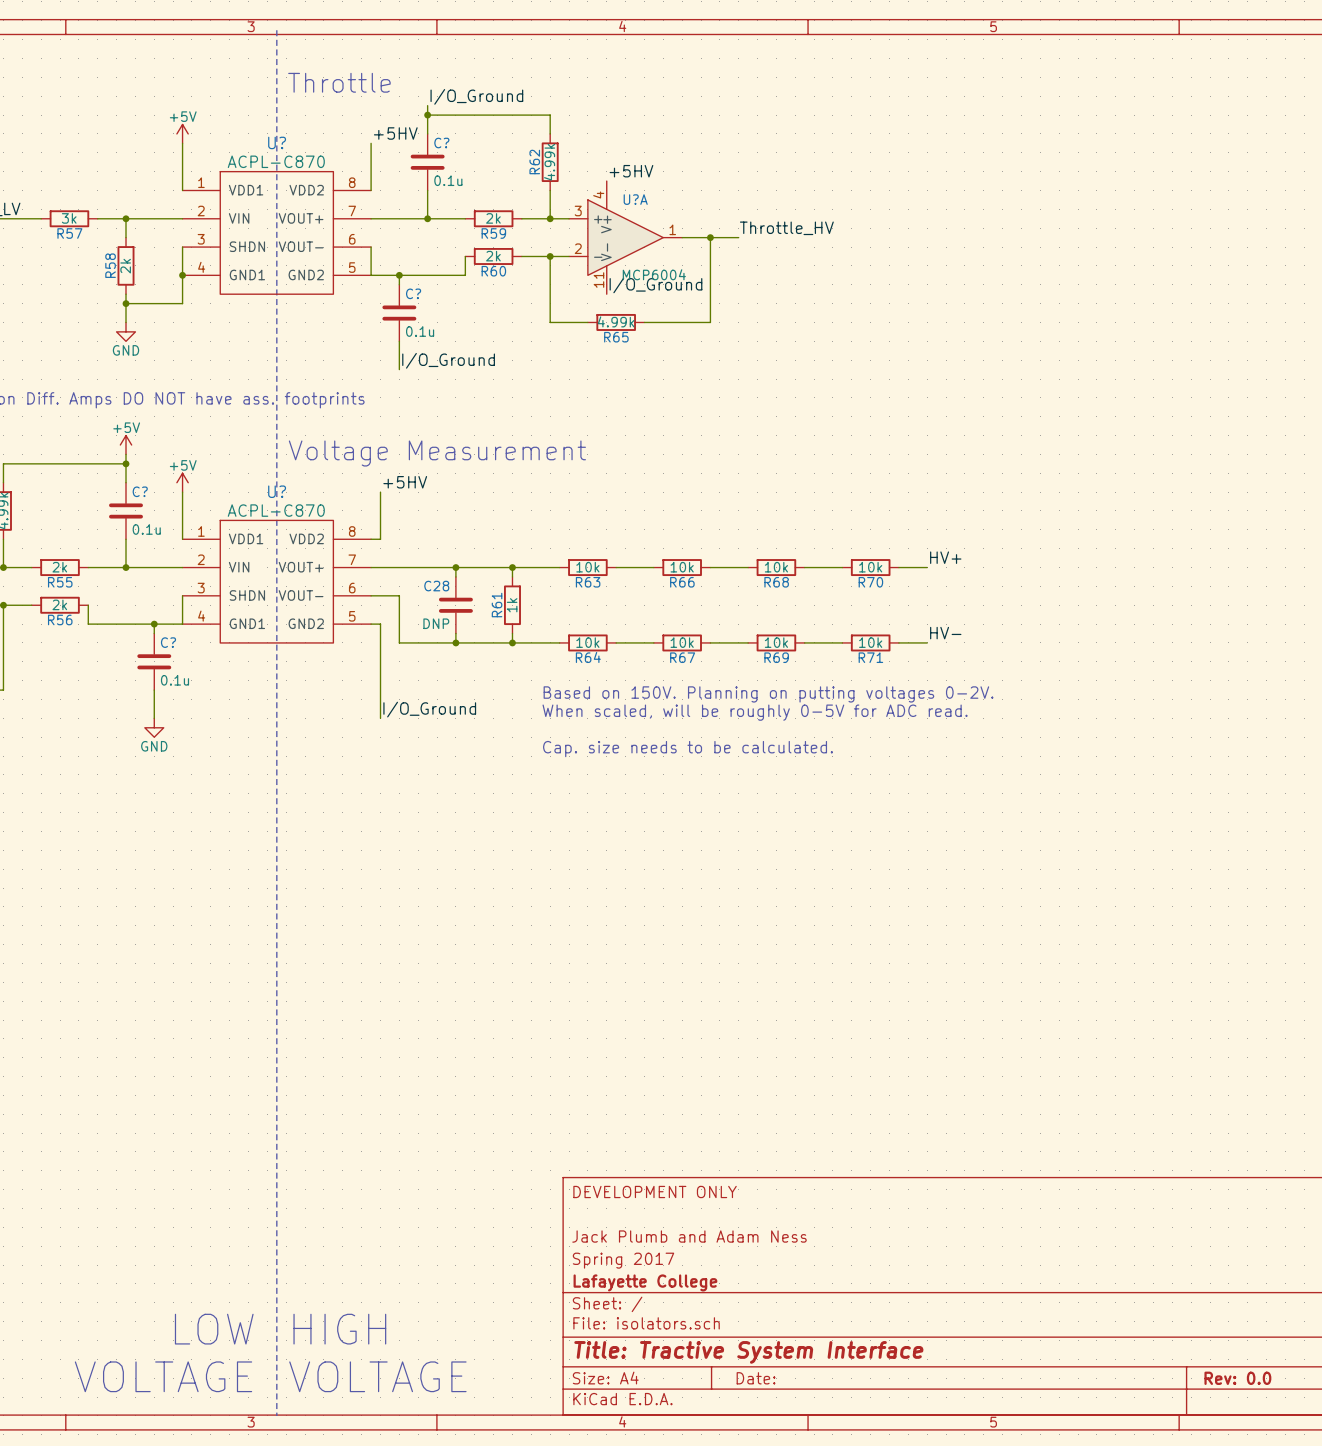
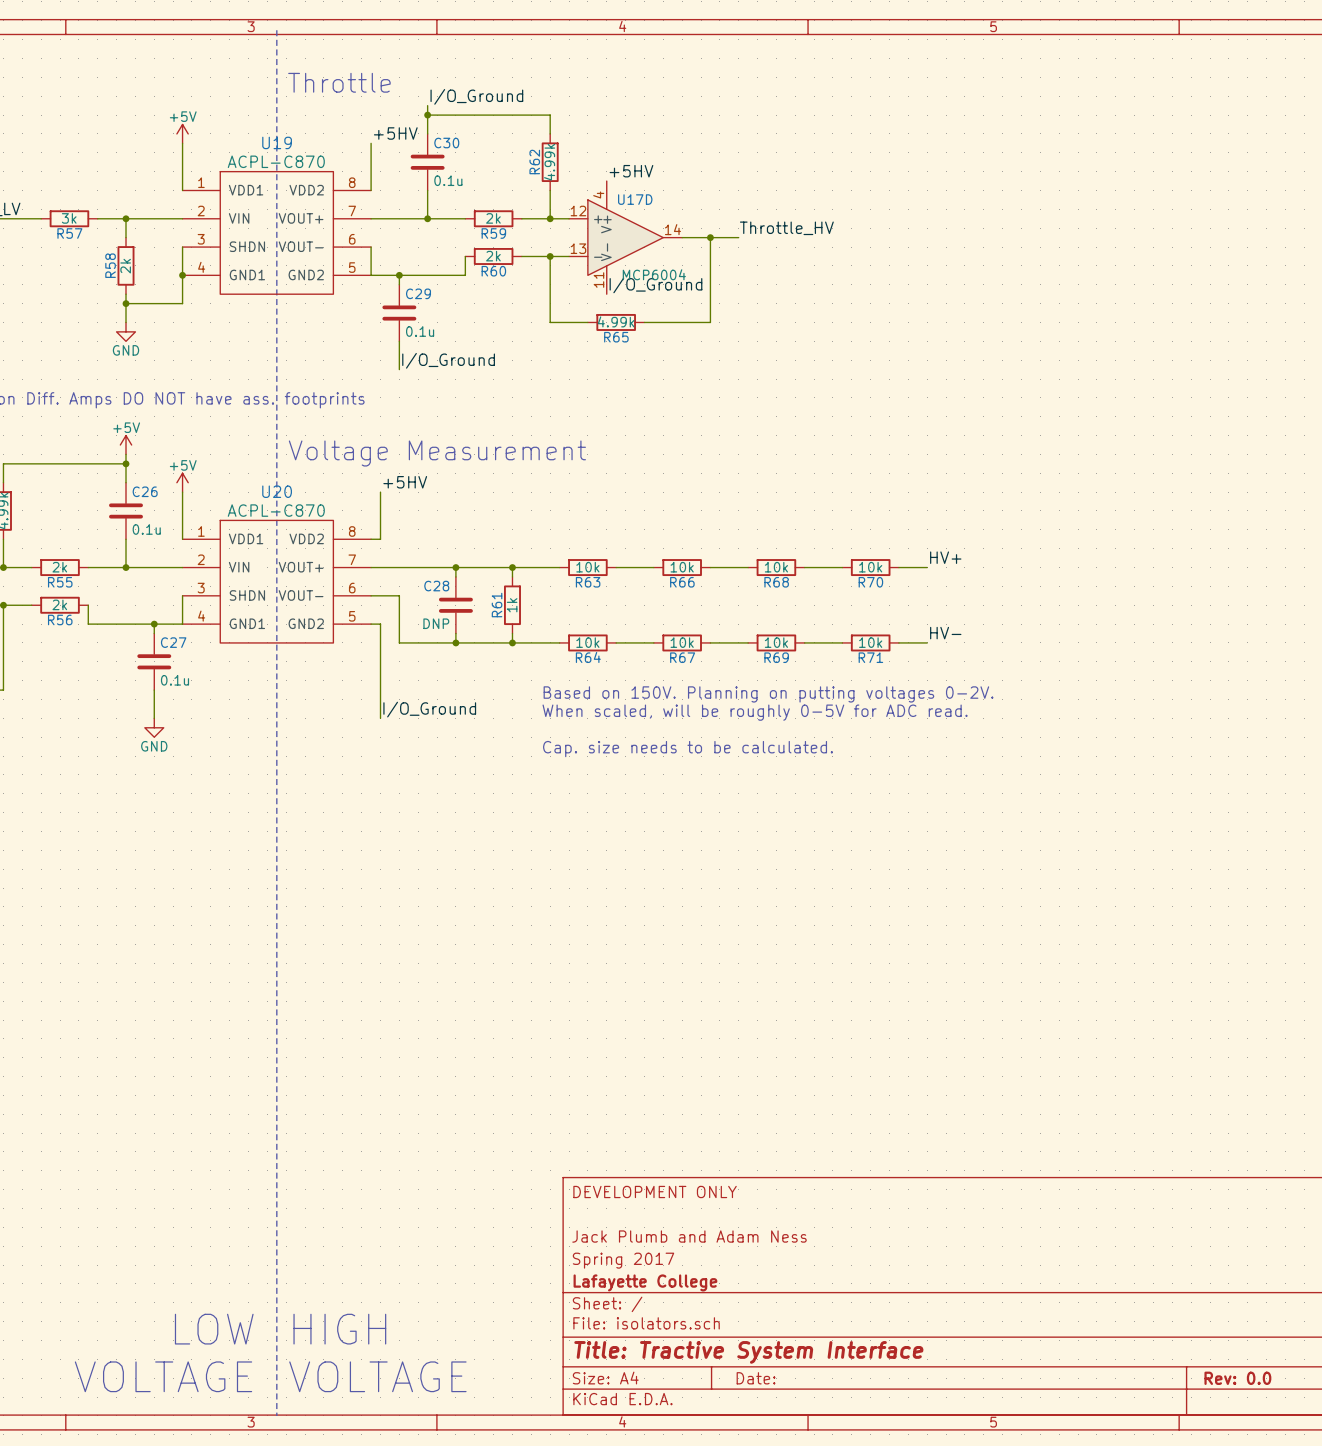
U? name: U? (277, 142) -> U19 (277, 142)
C? name: C? (441, 143) -> C30 (446, 143)
U?A name: U?A (635, 199) -> U17D (635, 199)
U?A pin number: 3 (578, 211) -> 12 (578, 211)
U?A pin number: 1 (672, 229) -> 14 (672, 229)
U?A pin number: 2 (578, 248) -> 13 (578, 248)
C? name: C? (413, 293) -> C29 (418, 293)
C? name: C? (140, 491) -> C26 (145, 491)
U? name: U? (277, 491) -> U20 (277, 491)
C? name: C? (168, 642) -> C27 (173, 642)

